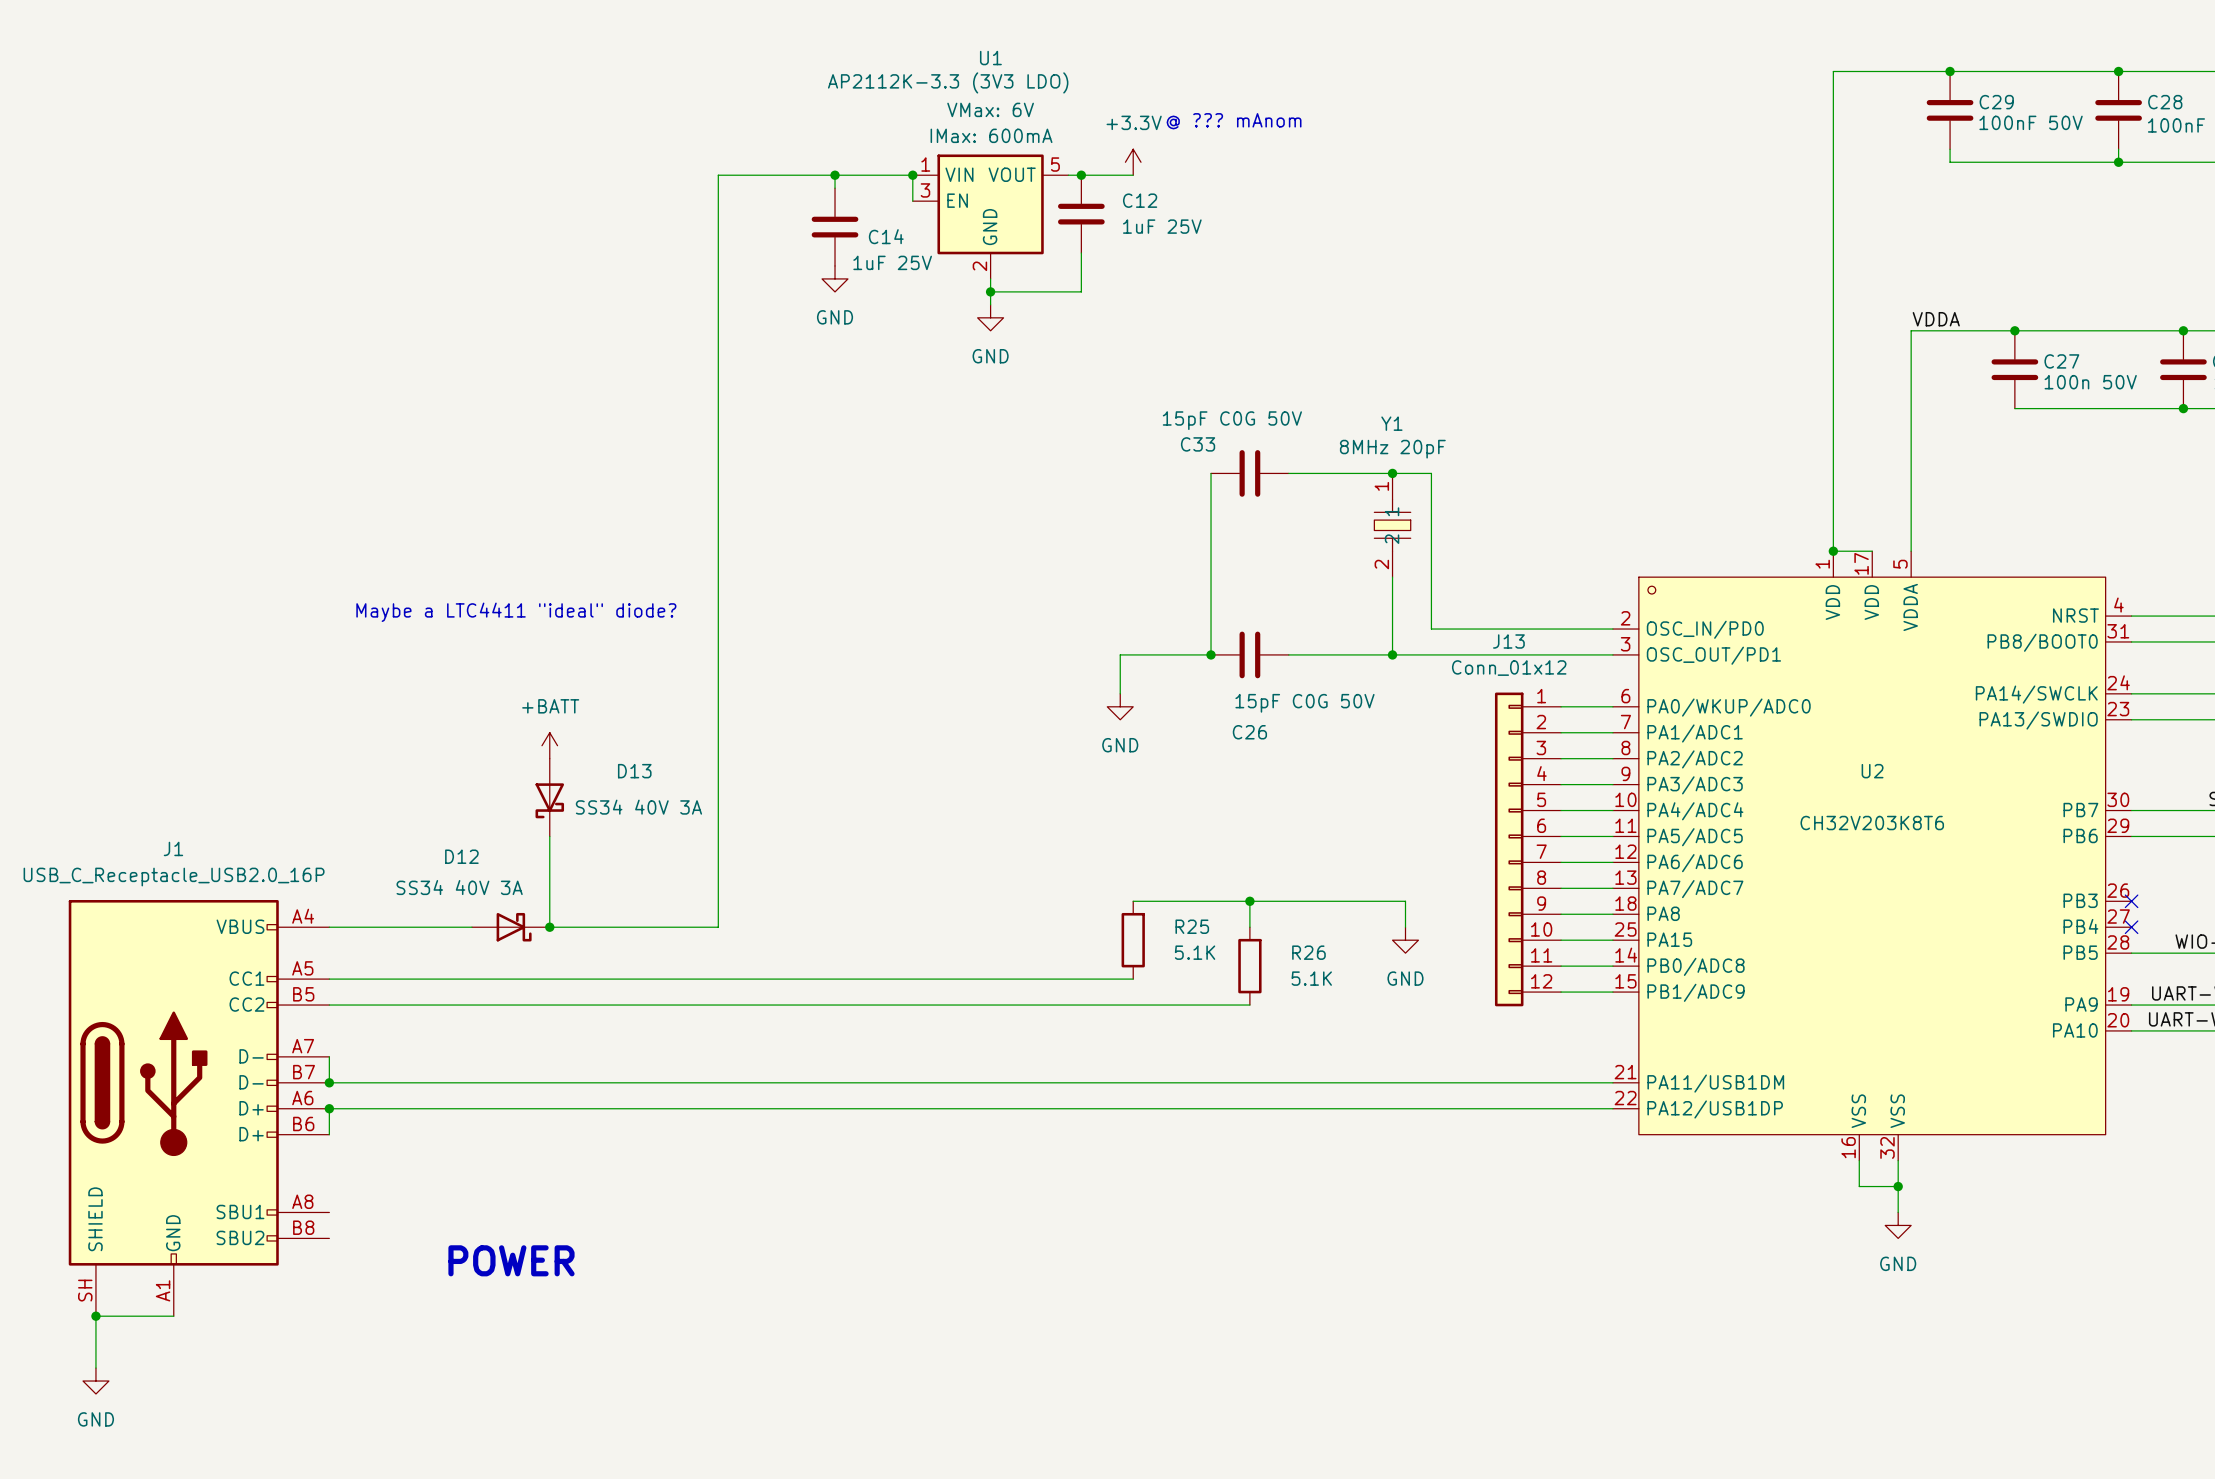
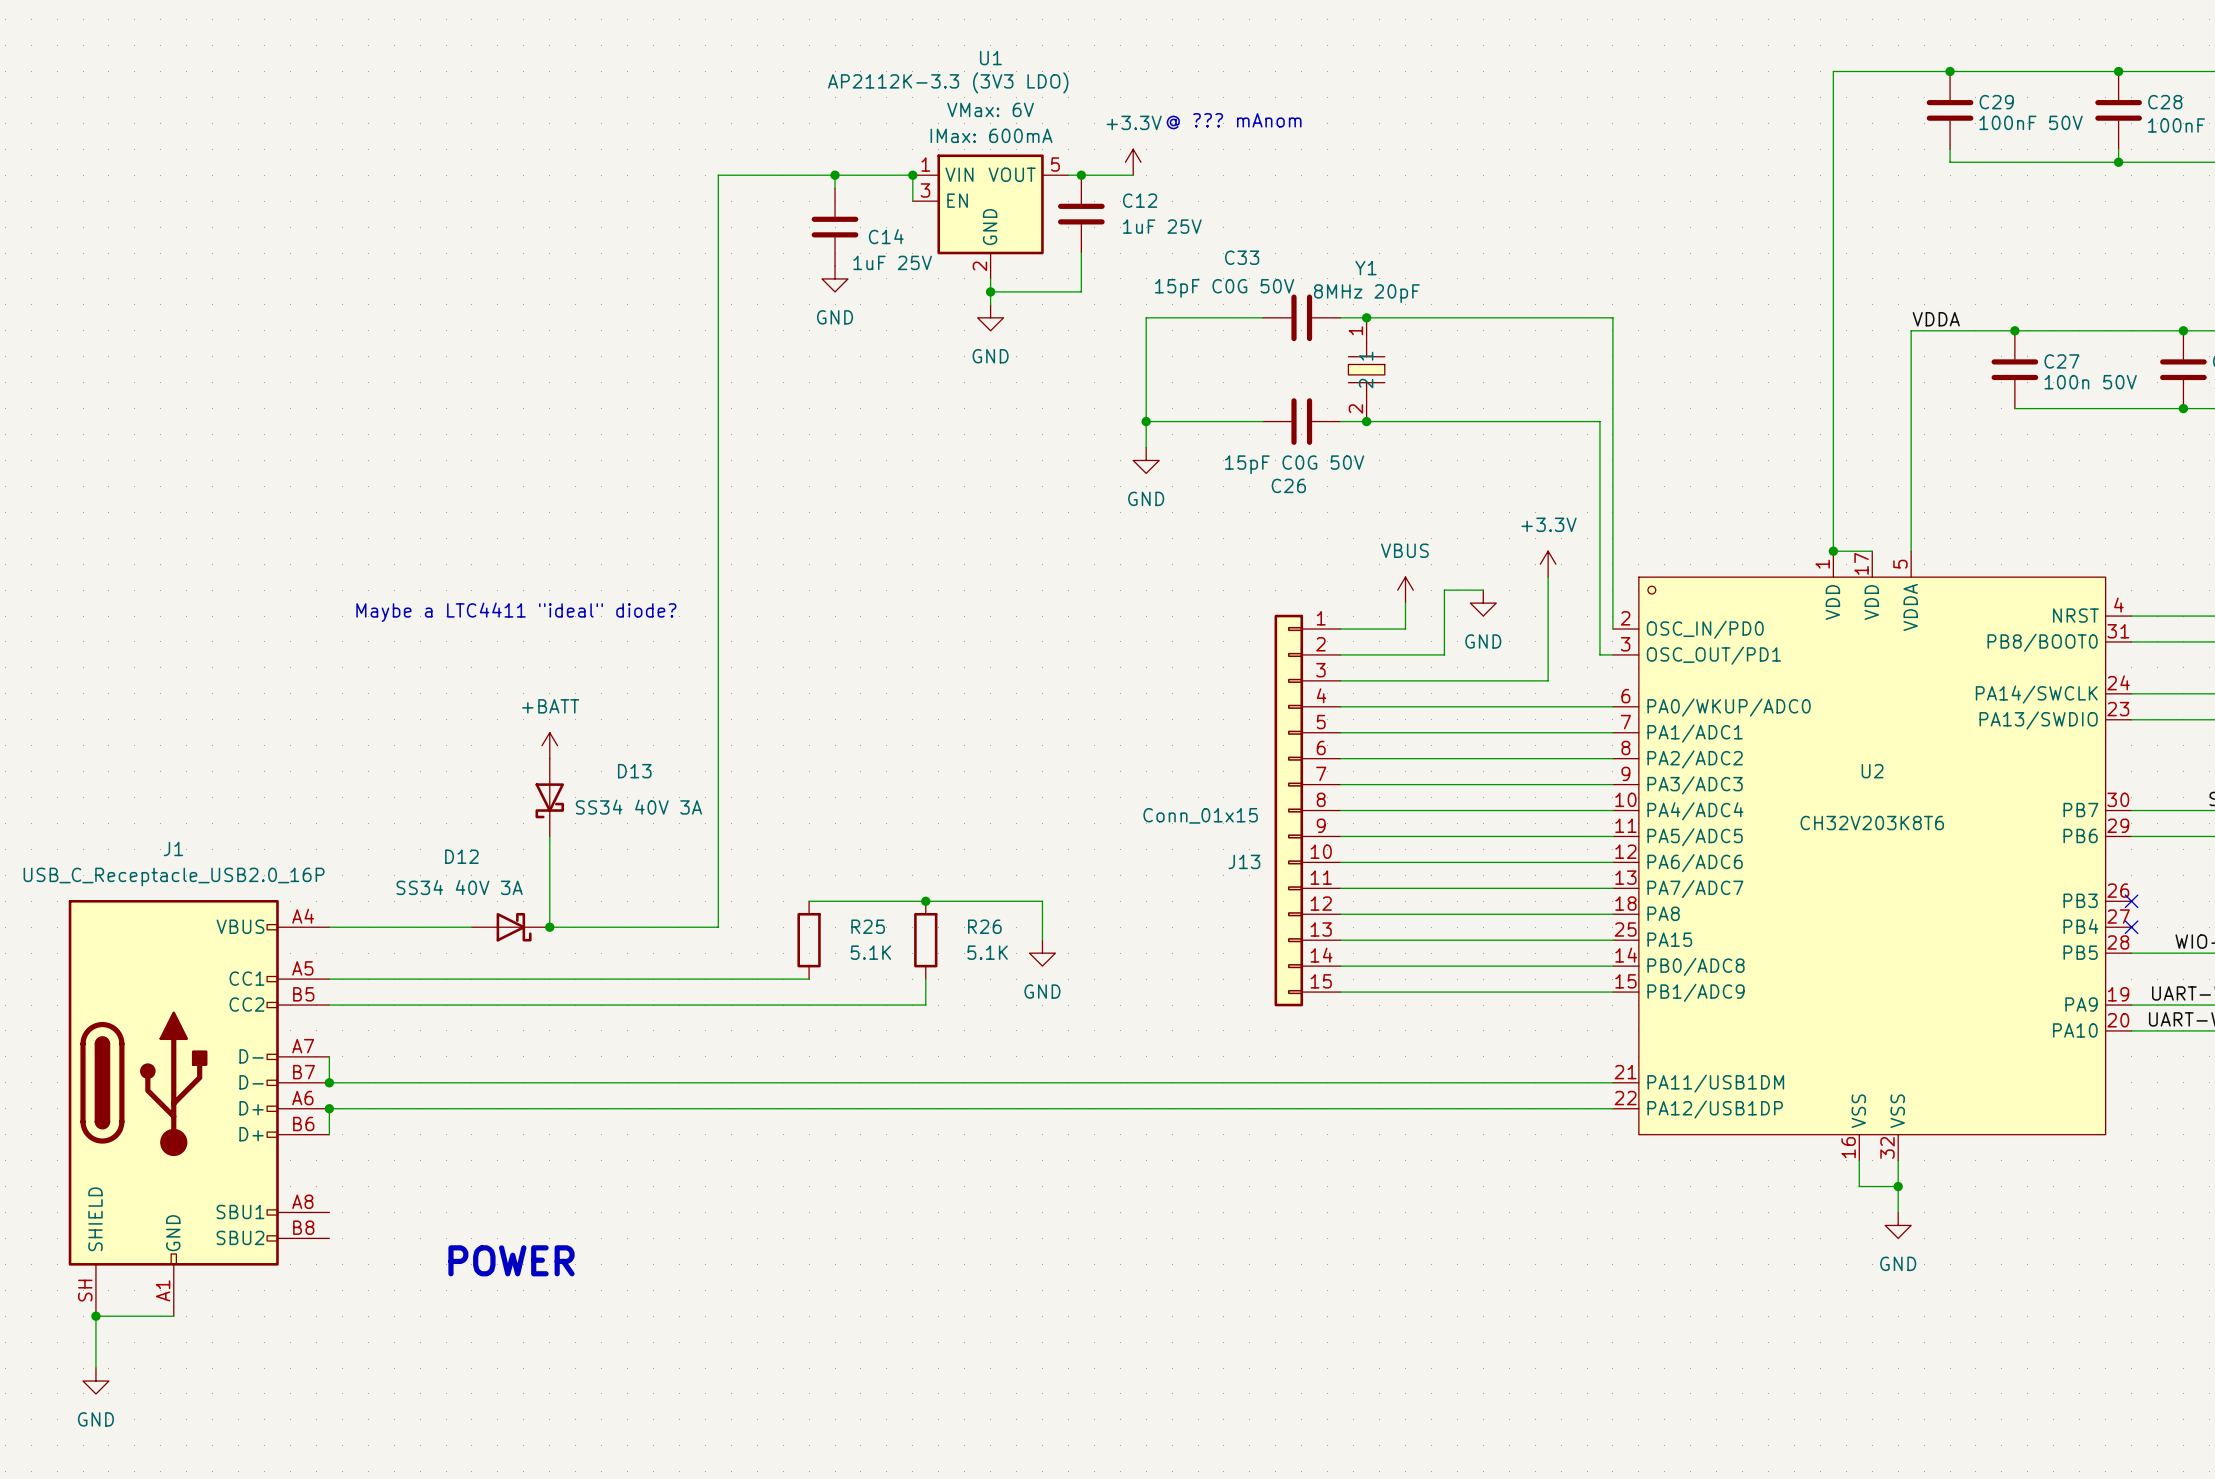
wire: none -> (1262, 317) (1146, 317) (1146, 447)
junction: none -> (1366, 317)
C33 value position: 15pF C0G 50V (1232, 420) -> 15pF C0G 50V (1224, 288)
wire: none -> (1146, 421) (1262, 421)
junction: none -> (1146, 421)
wire: none -> (1340, 421) (1599, 421) (1599, 654)
C33 name position: C33 (1198, 444) -> C33 (1242, 257)
power symbol: none -> GND (1146, 460)
wire: (1211, 473) (1211, 654) (1120, 654) (1120, 693) -> none
C33 position: (1249, 473) -> (1301, 317)
wire: (1288, 473) (1431, 473) (1431, 629) (1612, 629) -> (1340, 317) (1612, 317) (1612, 629)
junction position: (1392, 473) -> (1366, 421)
Y1 position: (1392, 525) -> (1366, 369)
power symbol: none -> +3.3V (1548, 564)
wire: (1392, 577) (1392, 654) -> none
wire: none -> (1548, 577) (1548, 680) (1340, 680)
power symbol: none -> VBUS (1405, 590)
wire: none -> (1405, 603) (1405, 629) (1340, 629)
power symbol: none -> GND (1483, 603)
J13 name position: J13 (1508, 641) -> J13 (1244, 861)
junction: (1211, 654) -> none
C26 position: (1249, 654) -> (1301, 421)
junction: (1392, 654) -> none
wire: (1444, 654) (1599, 654) -> (1444, 654) (1444, 590) (1483, 590)
J13 value: Conn_01x12 (1509, 668) -> Conn_01x15 (1200, 815)
J13 symbol: [1494, 692, 1562, 1007] -> [1274, 614, 1341, 1007]
C26 value position: 15pF C0G 50V (1304, 703) -> 15pF C0G 50V (1294, 464)
power symbol: GND (1120, 706) -> none
wire: none -> (1340, 706) (1561, 706)
C26 name position: C26 (1249, 732) -> C26 (1288, 485)
wire: none -> (1340, 732) (1561, 732)
wire: none -> (1340, 758) (1561, 758)
wire: none -> (1340, 784) (1561, 784)
wire: none -> (1340, 810) (1561, 810)
wire: none -> (1340, 836) (1561, 836)
wire: none -> (1340, 862) (1561, 862)
wire: none -> (1340, 888) (1561, 888)
wire: none -> (809, 901) (1042, 901) (1042, 940)
junction: none -> (925, 901)
wire: (1133, 901) (1405, 901) (1405, 927) -> none
wire: (1249, 901) (1249, 927) -> none
junction: (1249, 901) -> none
wire: none -> (1340, 914) (1561, 914)
R25 position: (1133, 940) -> (809, 940)
wire: none -> (1340, 940) (1561, 940)
power symbol: GND (1405, 940) -> none
power symbol: none -> GND (1042, 953)
R26 position: (1249, 966) -> (925, 940)
wire: none -> (1340, 966) (1561, 966)
wire: (809, 979) (1133, 979) -> none
wire: none -> (1340, 992) (1561, 992)
wire: (925, 1005) (1249, 1005) -> (925, 1005) (925, 979)

